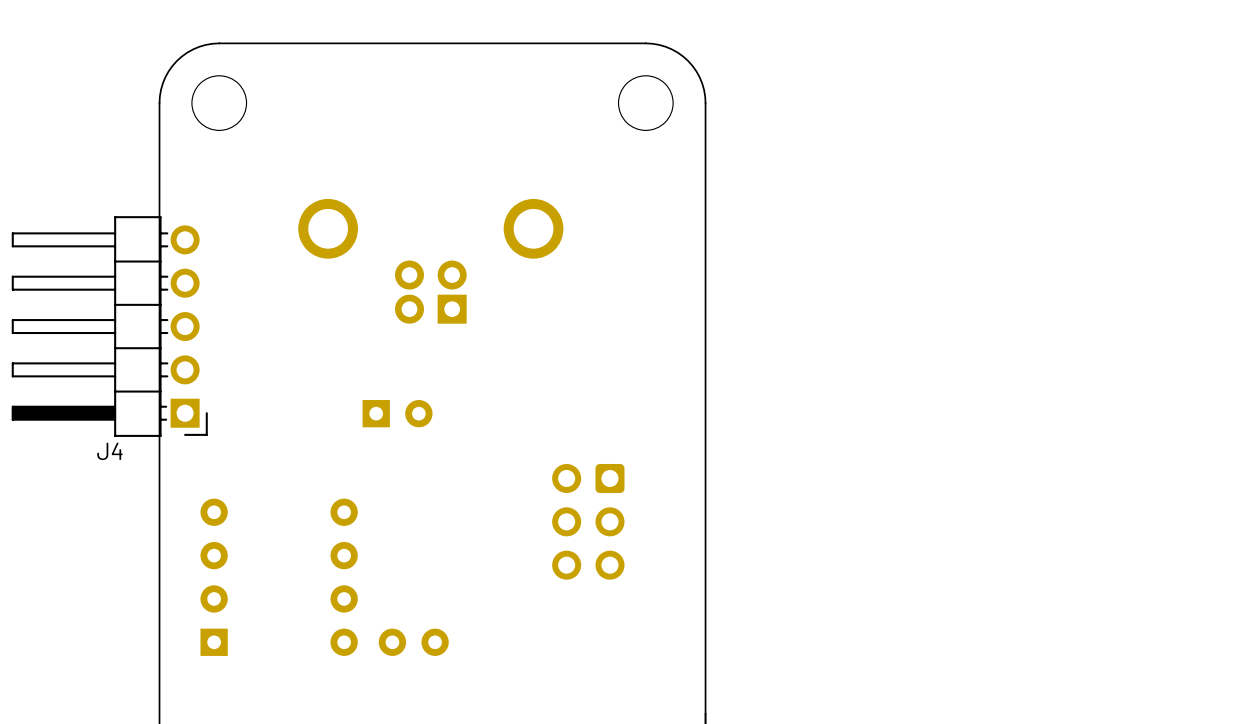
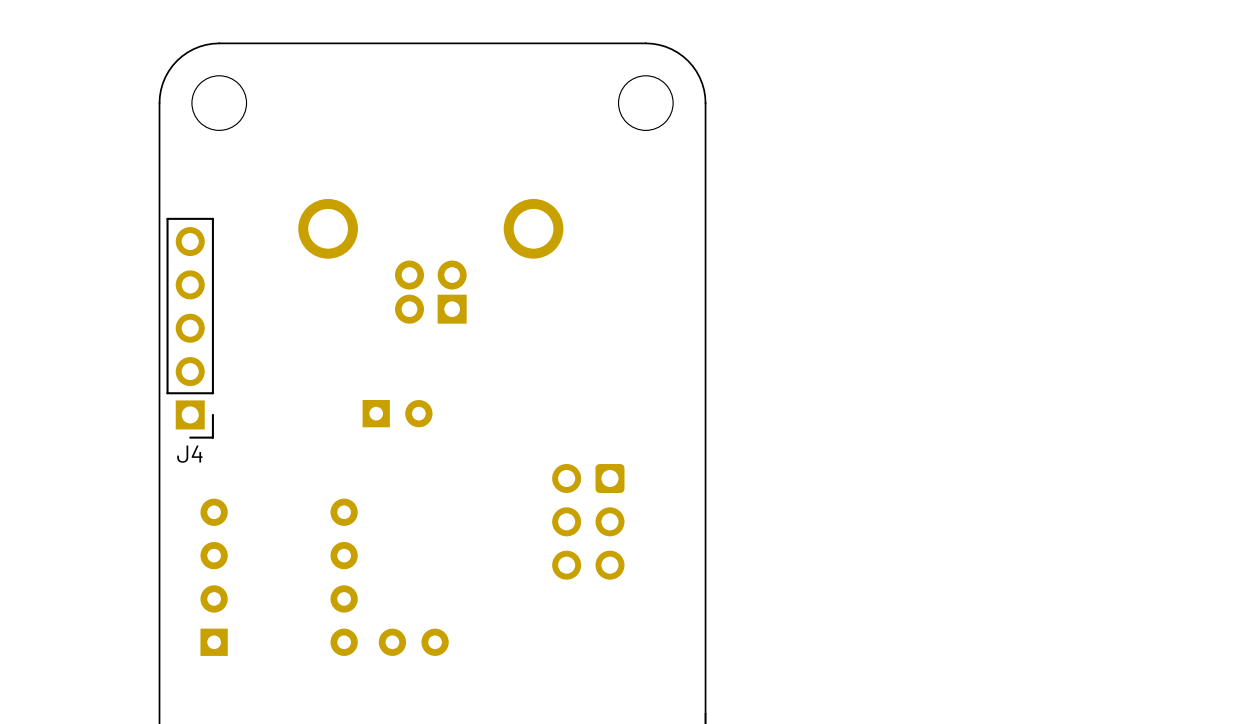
J4 footprint: [11, 216, 208, 437] -> [166, 217, 214, 439]

